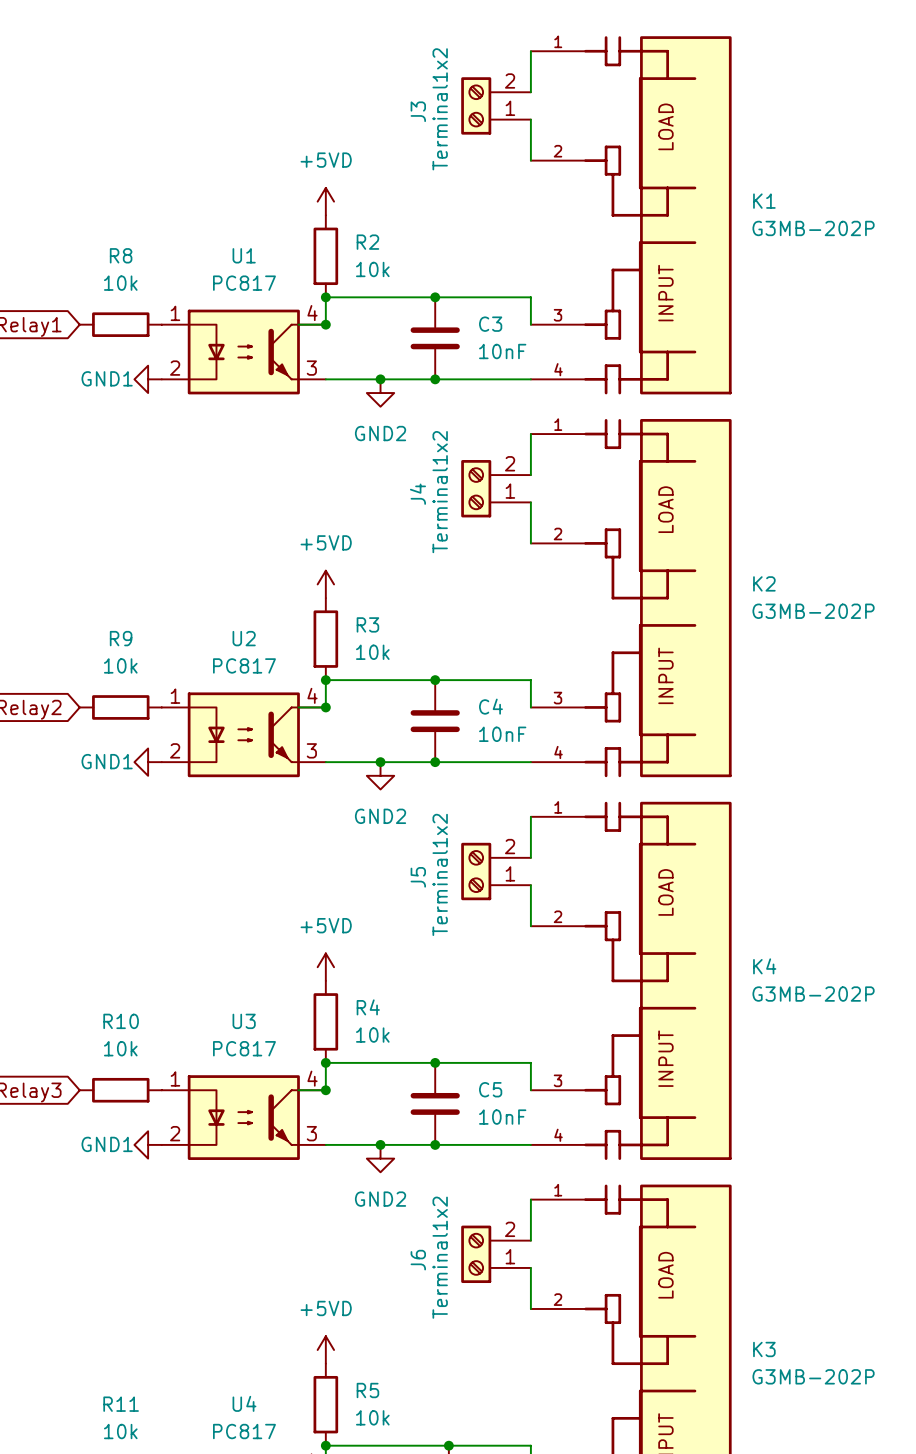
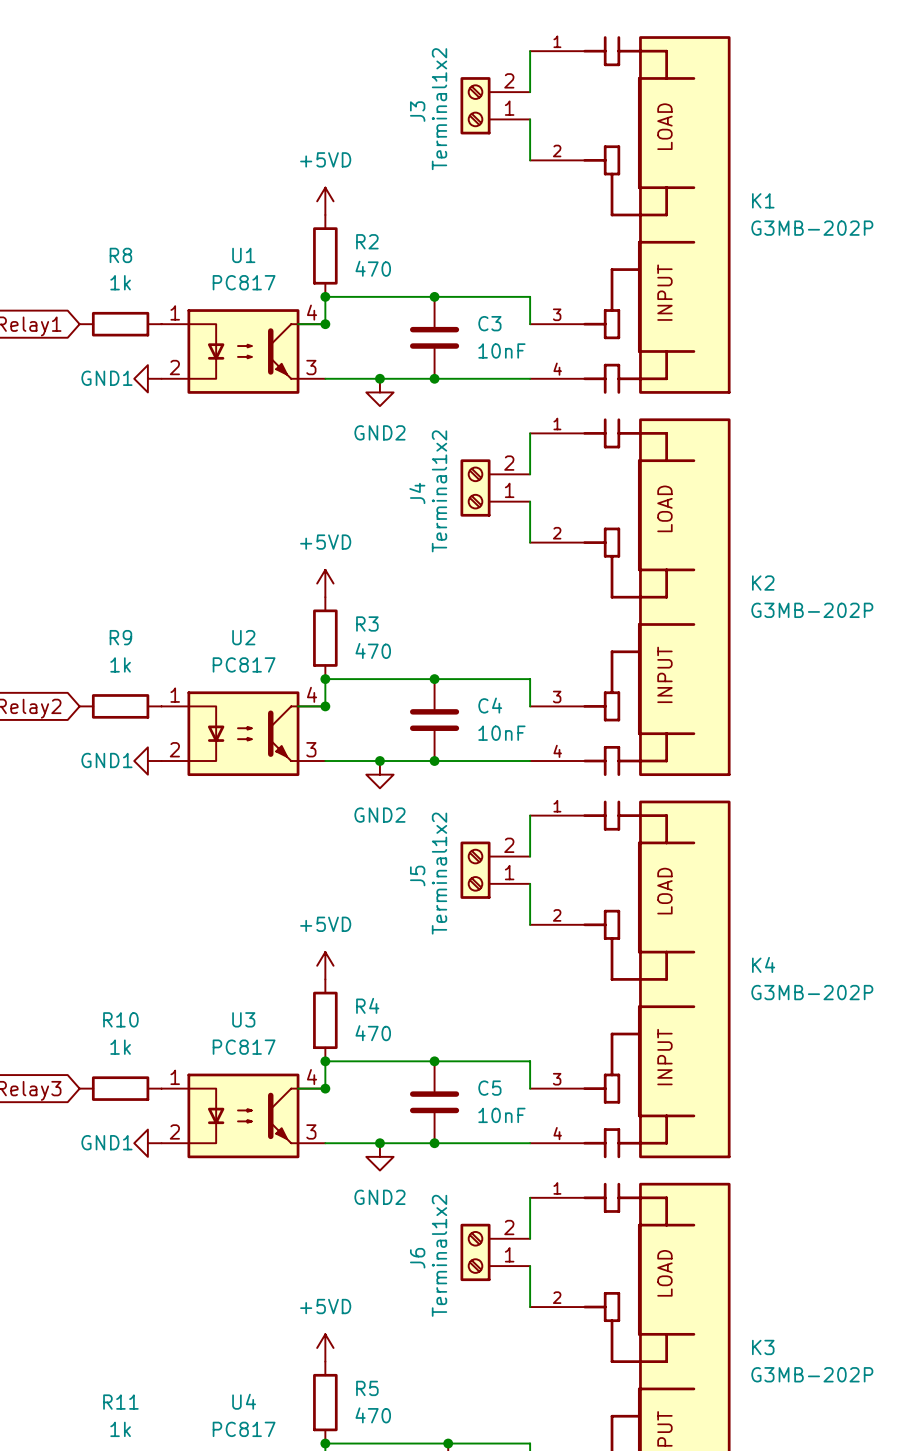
R2 value: 10k (372, 269) -> 470 (373, 268)
R8 value: 10k (120, 283) -> 1k (120, 282)
R3 value: 10k (372, 652) -> 470 (373, 650)
R9 value: 10k (120, 665) -> 1k (120, 664)
R4 value: 10k (372, 1035) -> 470 (373, 1033)
R10 value: 10k (120, 1048) -> 1k (120, 1047)
R5 value: 10k (372, 1417) -> 470 (373, 1415)
R11 value: 10k (120, 1431) -> 1k (120, 1429)

